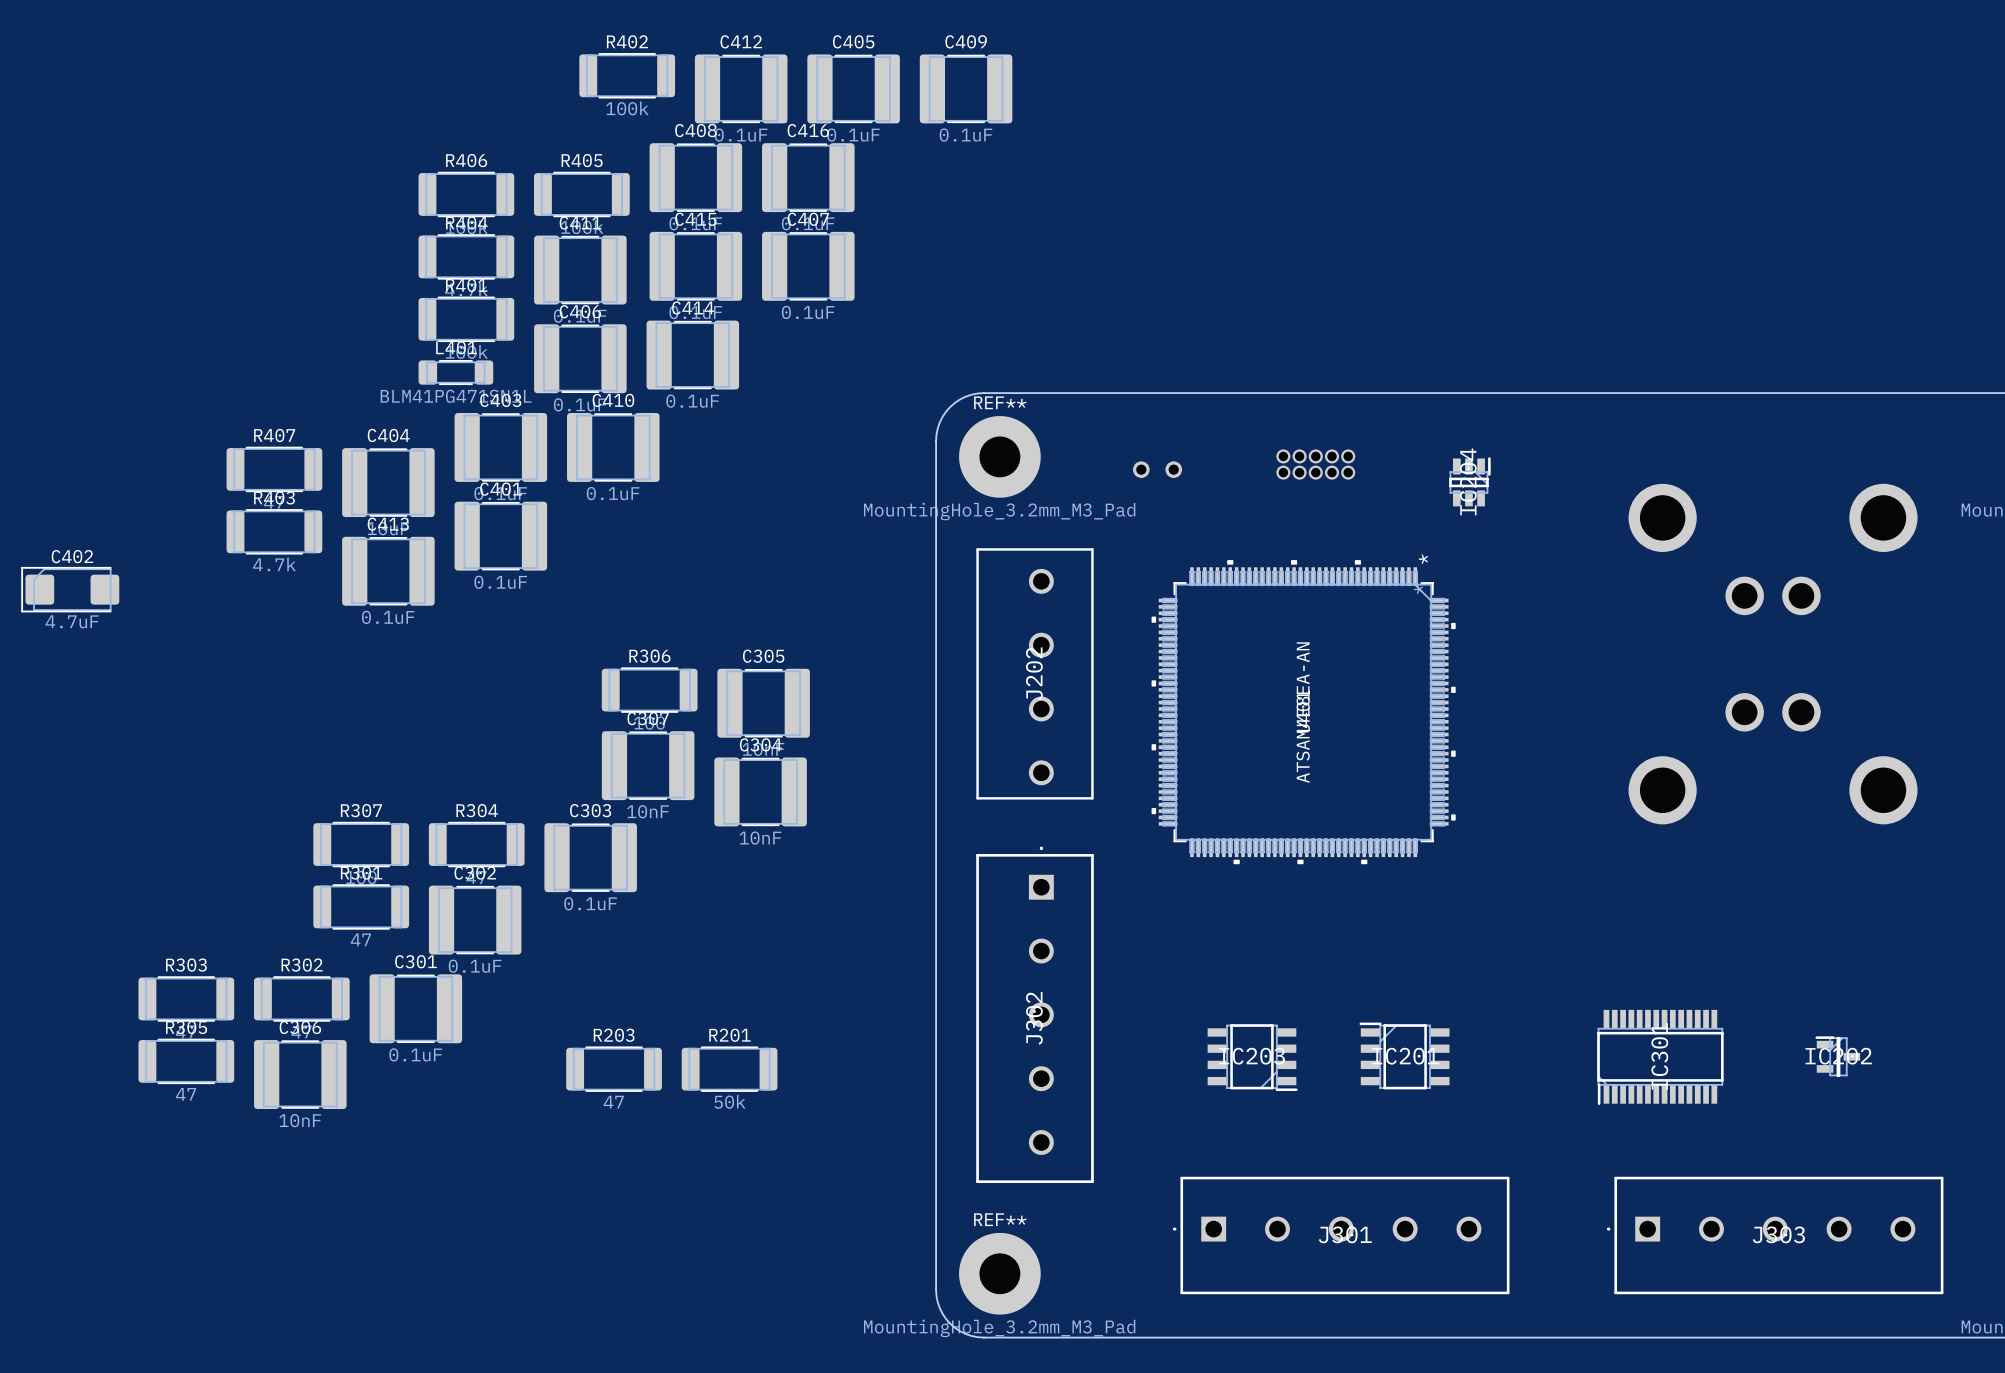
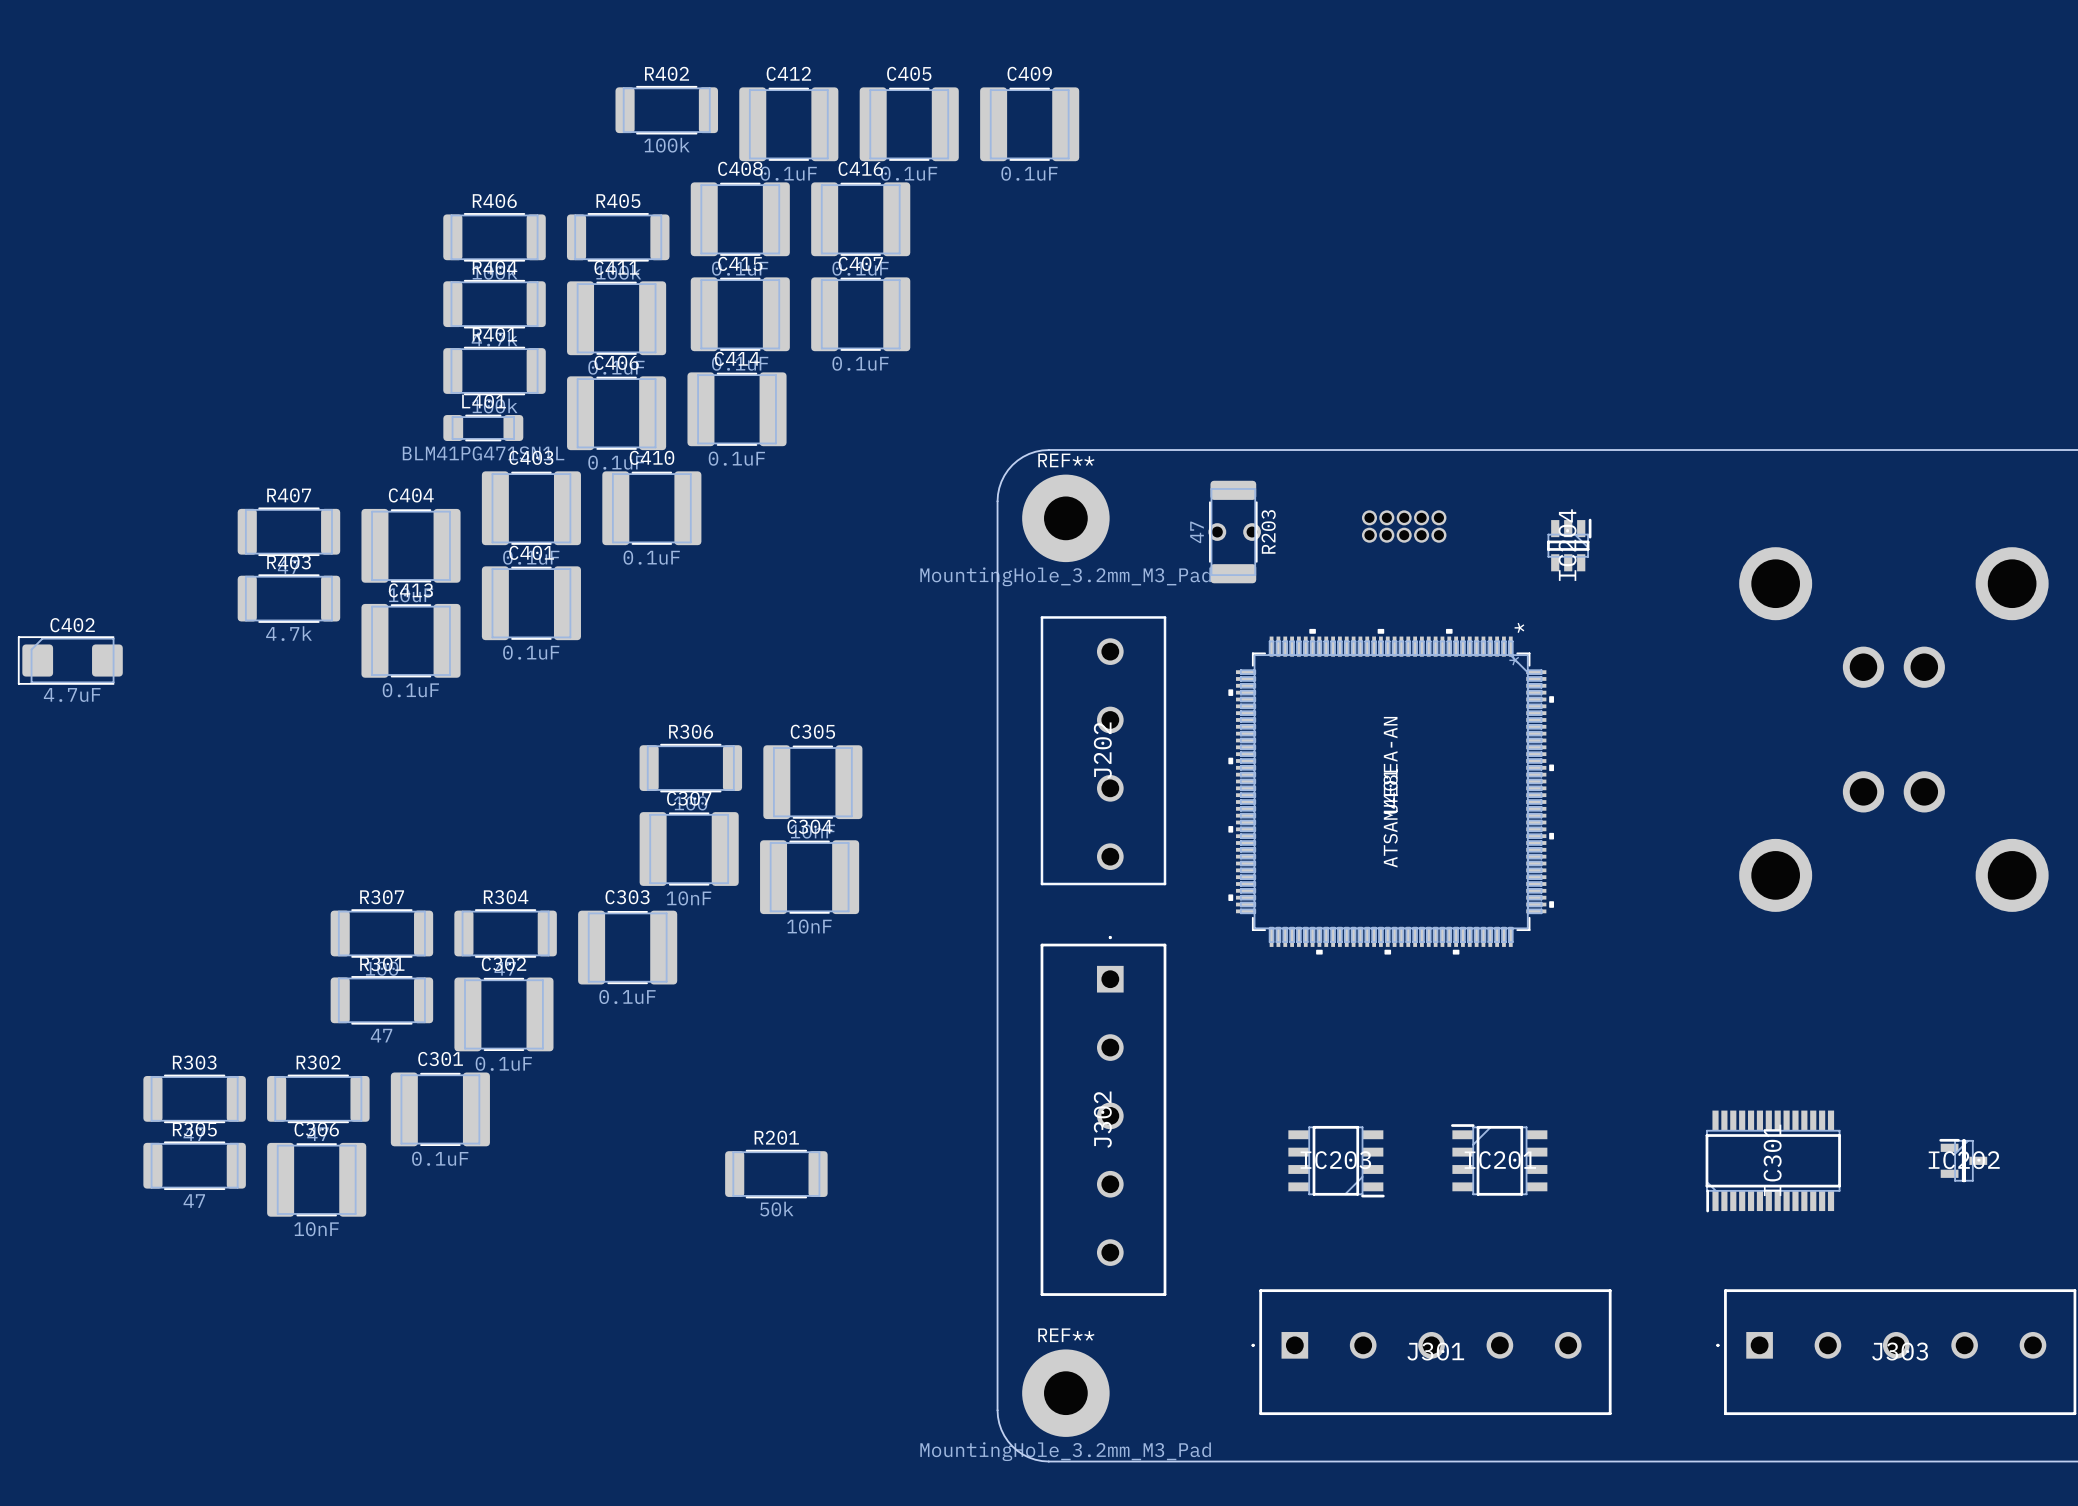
R203 rotation: 0° (614, 1069) -> 90° clockwise (1233, 532)
R203 position: (614, 1069) -> (1233, 532)

